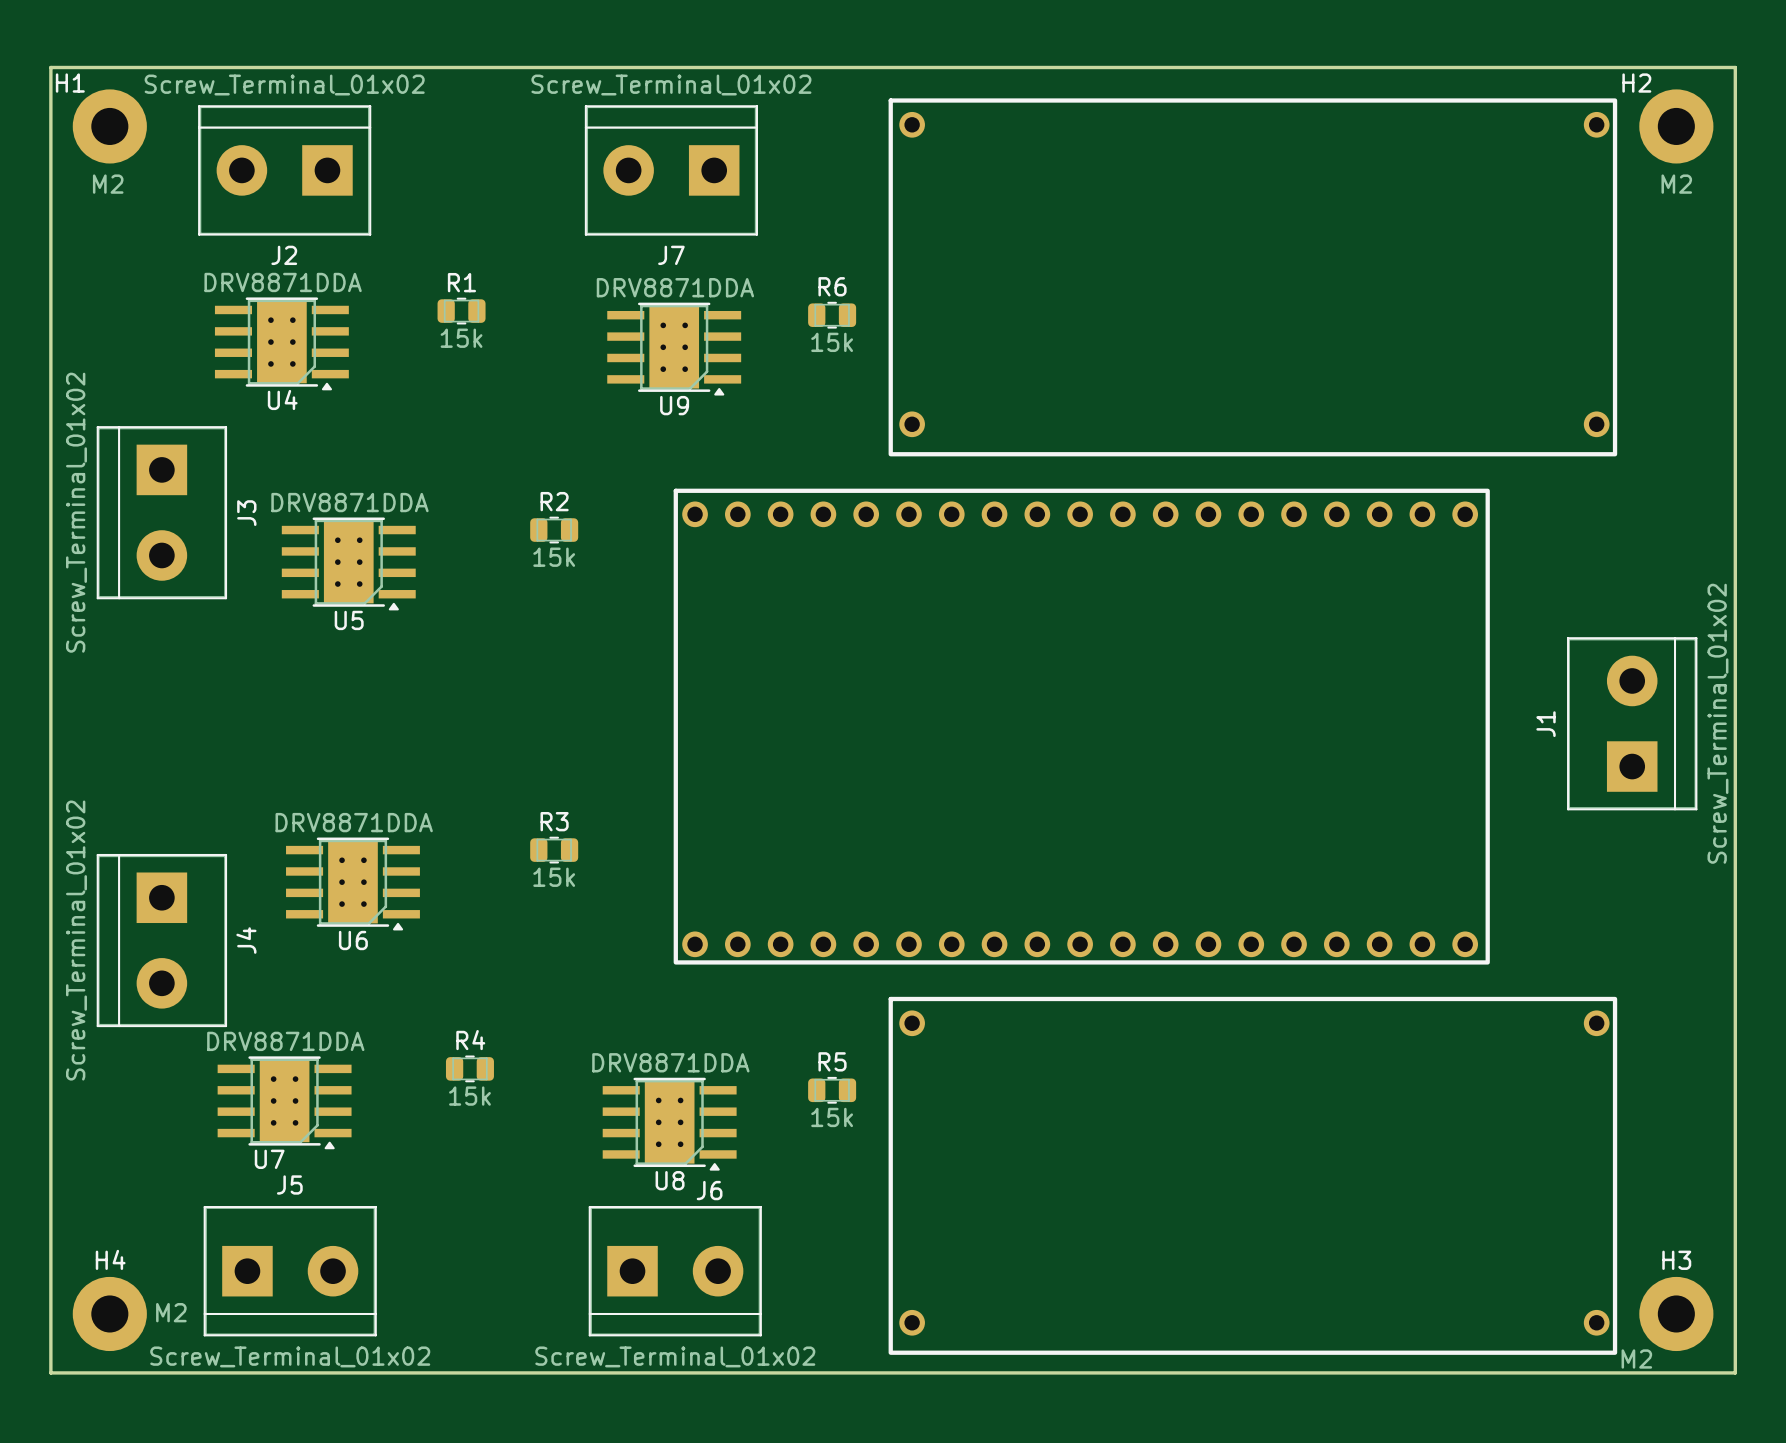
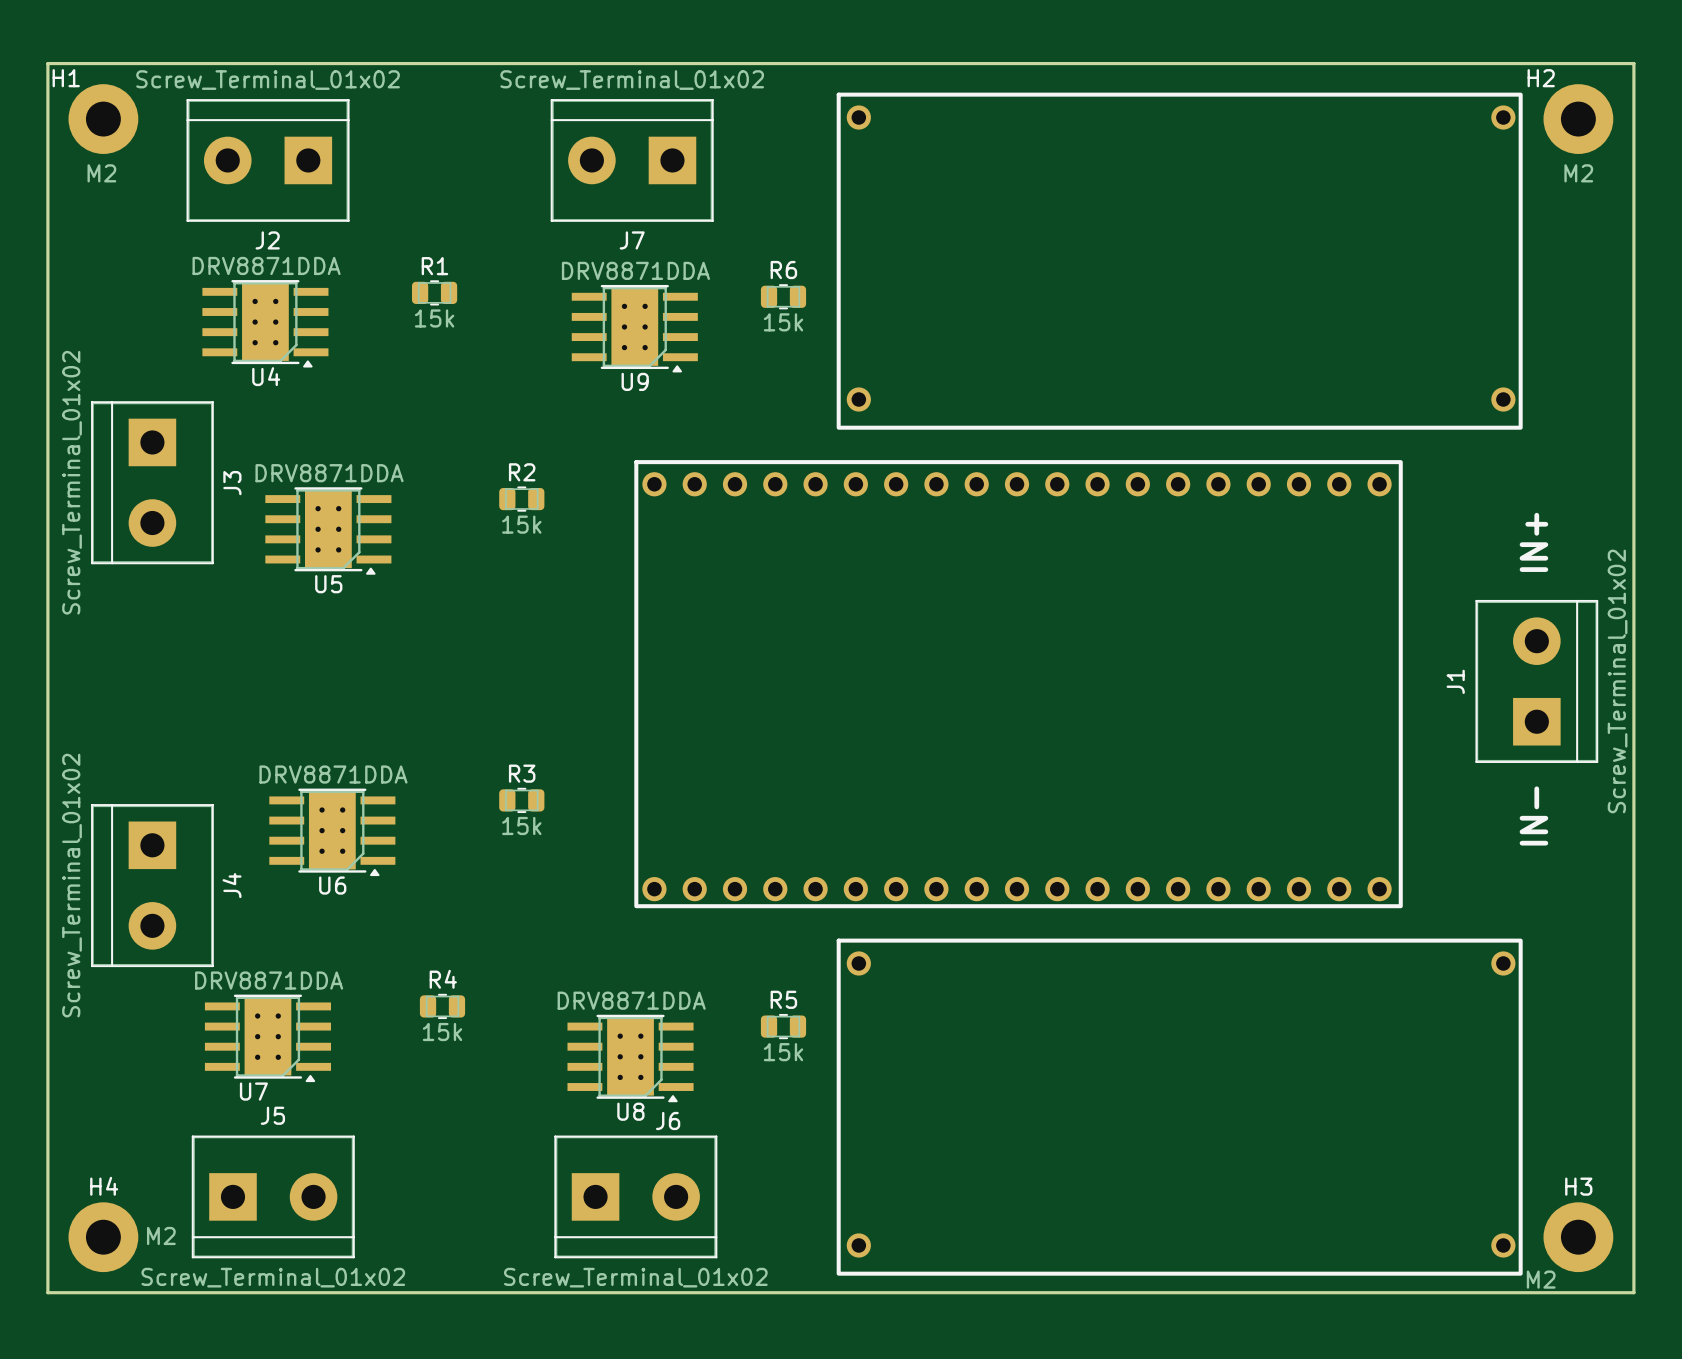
text: none -> IN+ (1533, 542)
text: none -> IN- (1533, 815)

